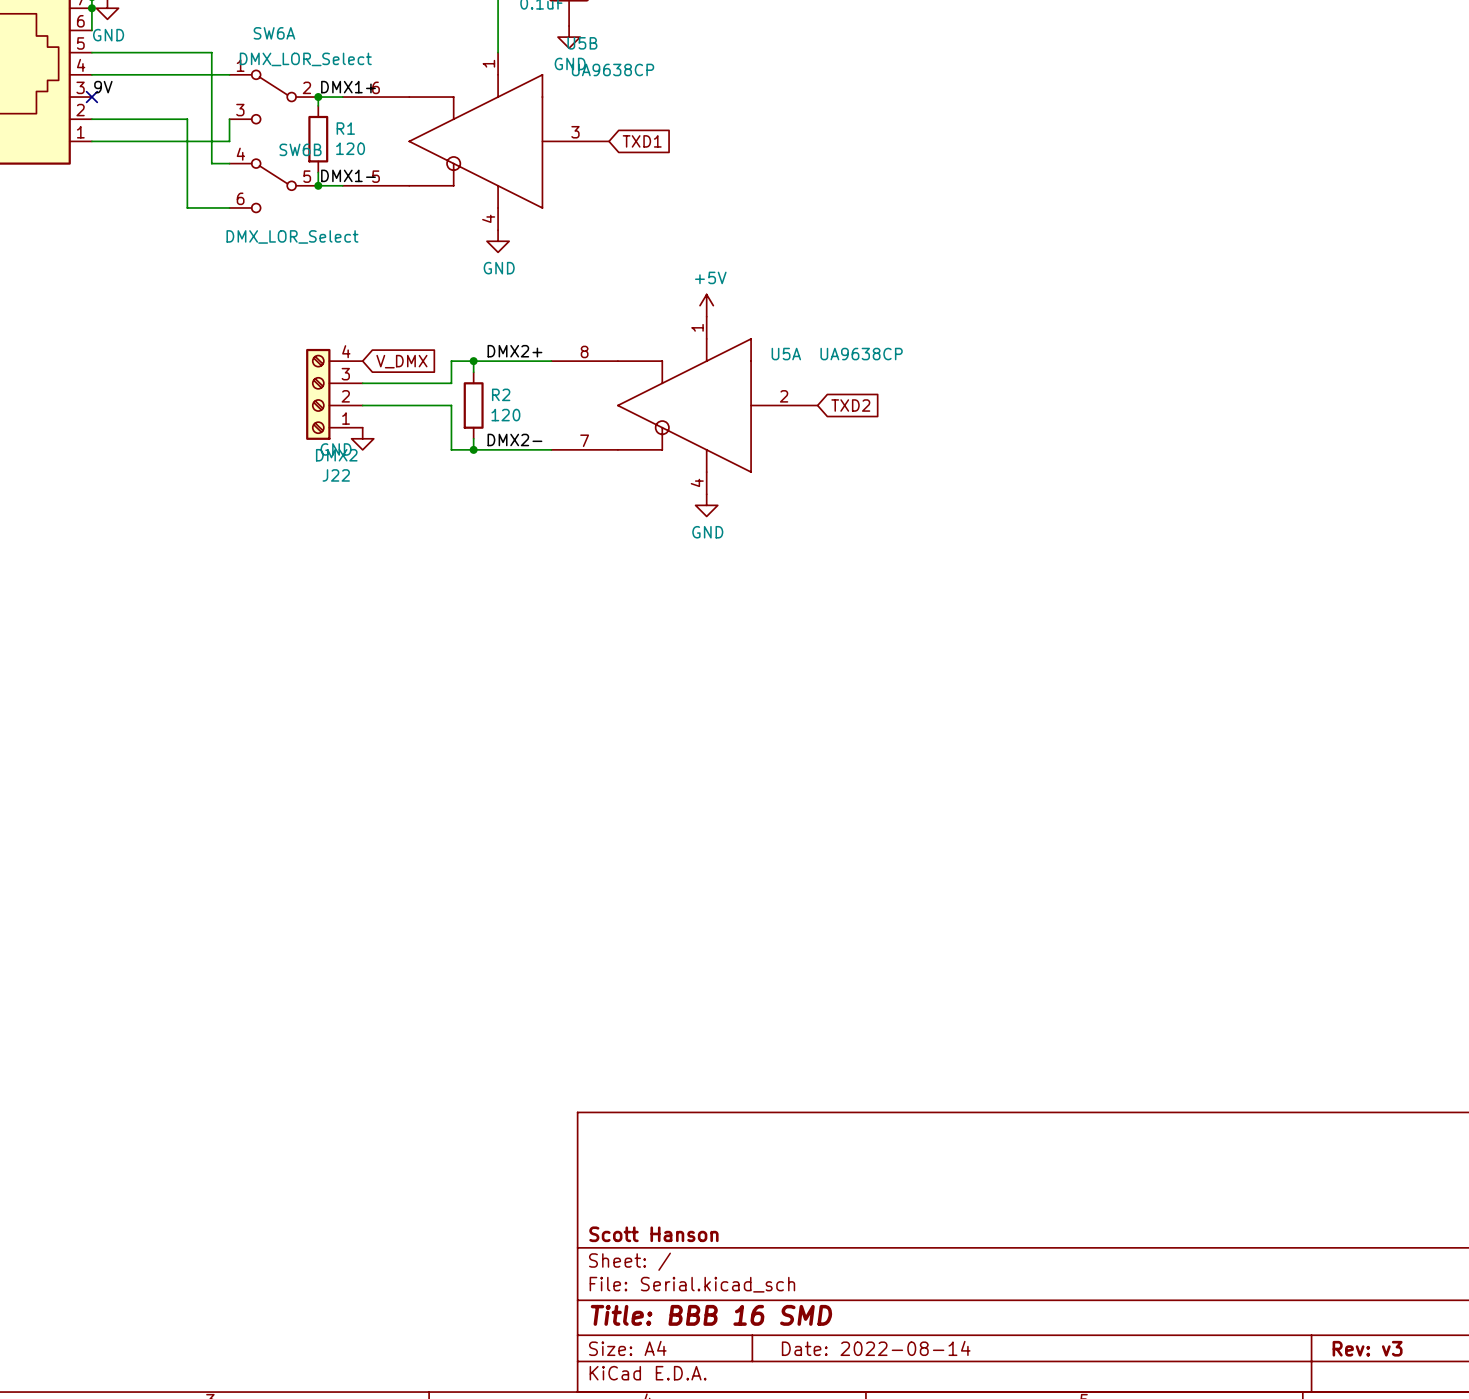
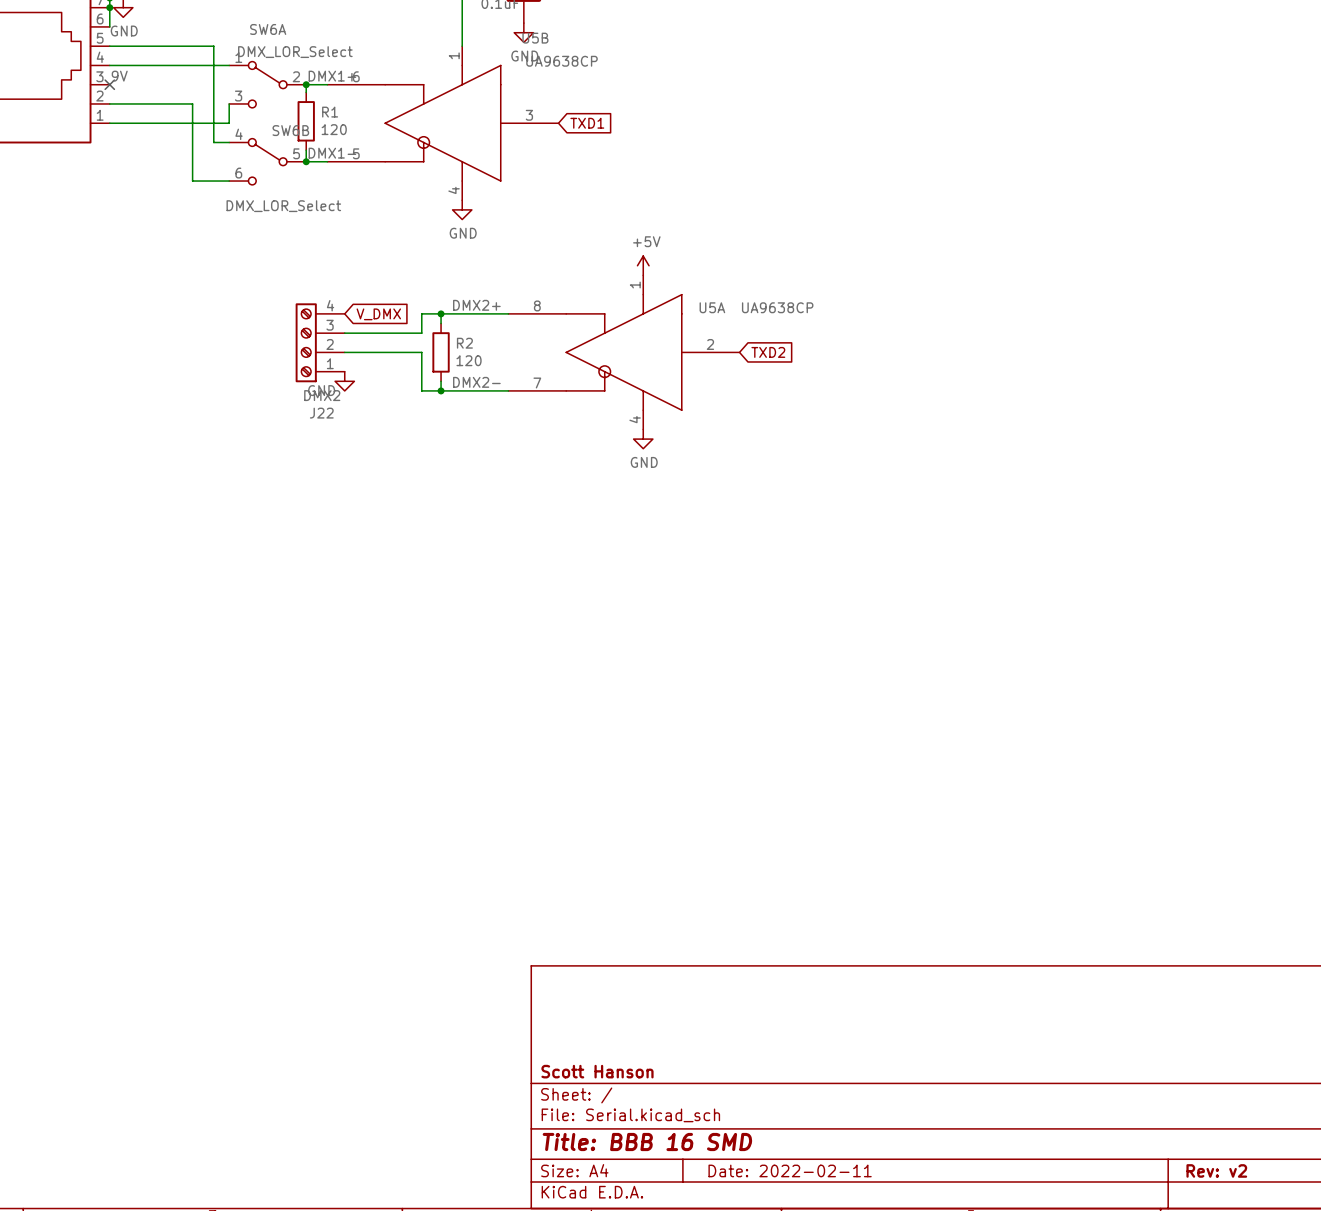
title block: Date: 2022-08-14 (876, 1348) -> Date: 2022-02-11 (790, 1170)
title block: Rev: v3 (1367, 1348) -> Rev: v2 (1216, 1170)

